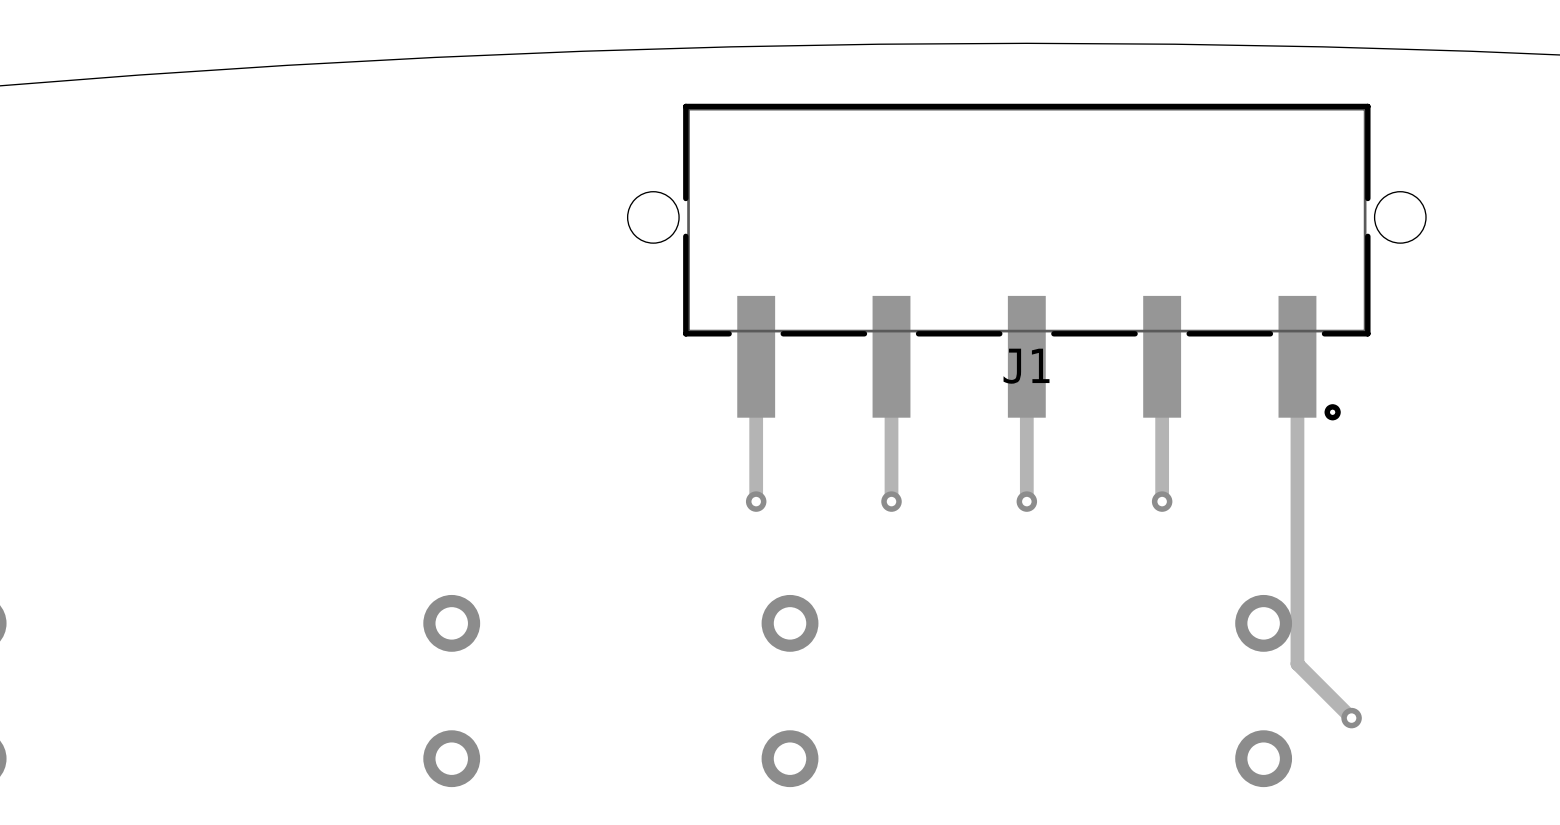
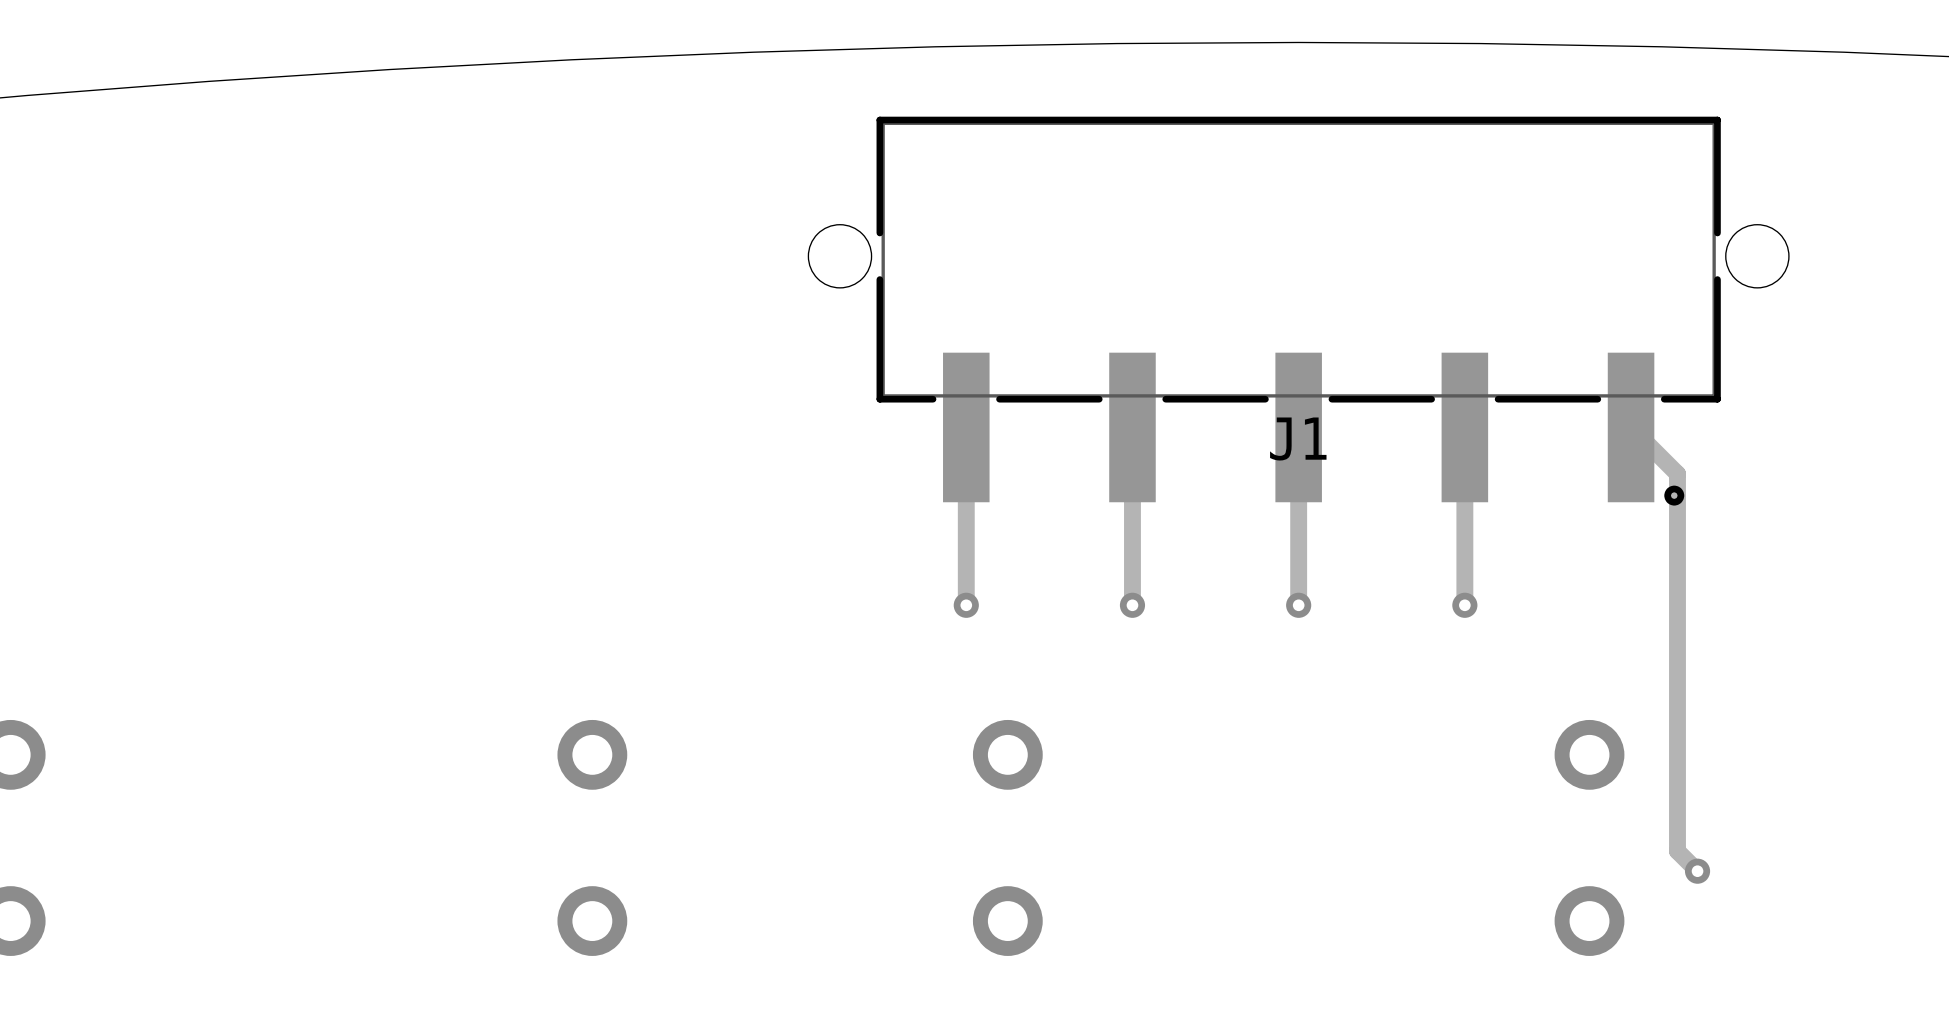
track: (1297, 356) (1297, 663) (1335, 701) -> (1631, 427) (1677, 473) (1677, 851)

